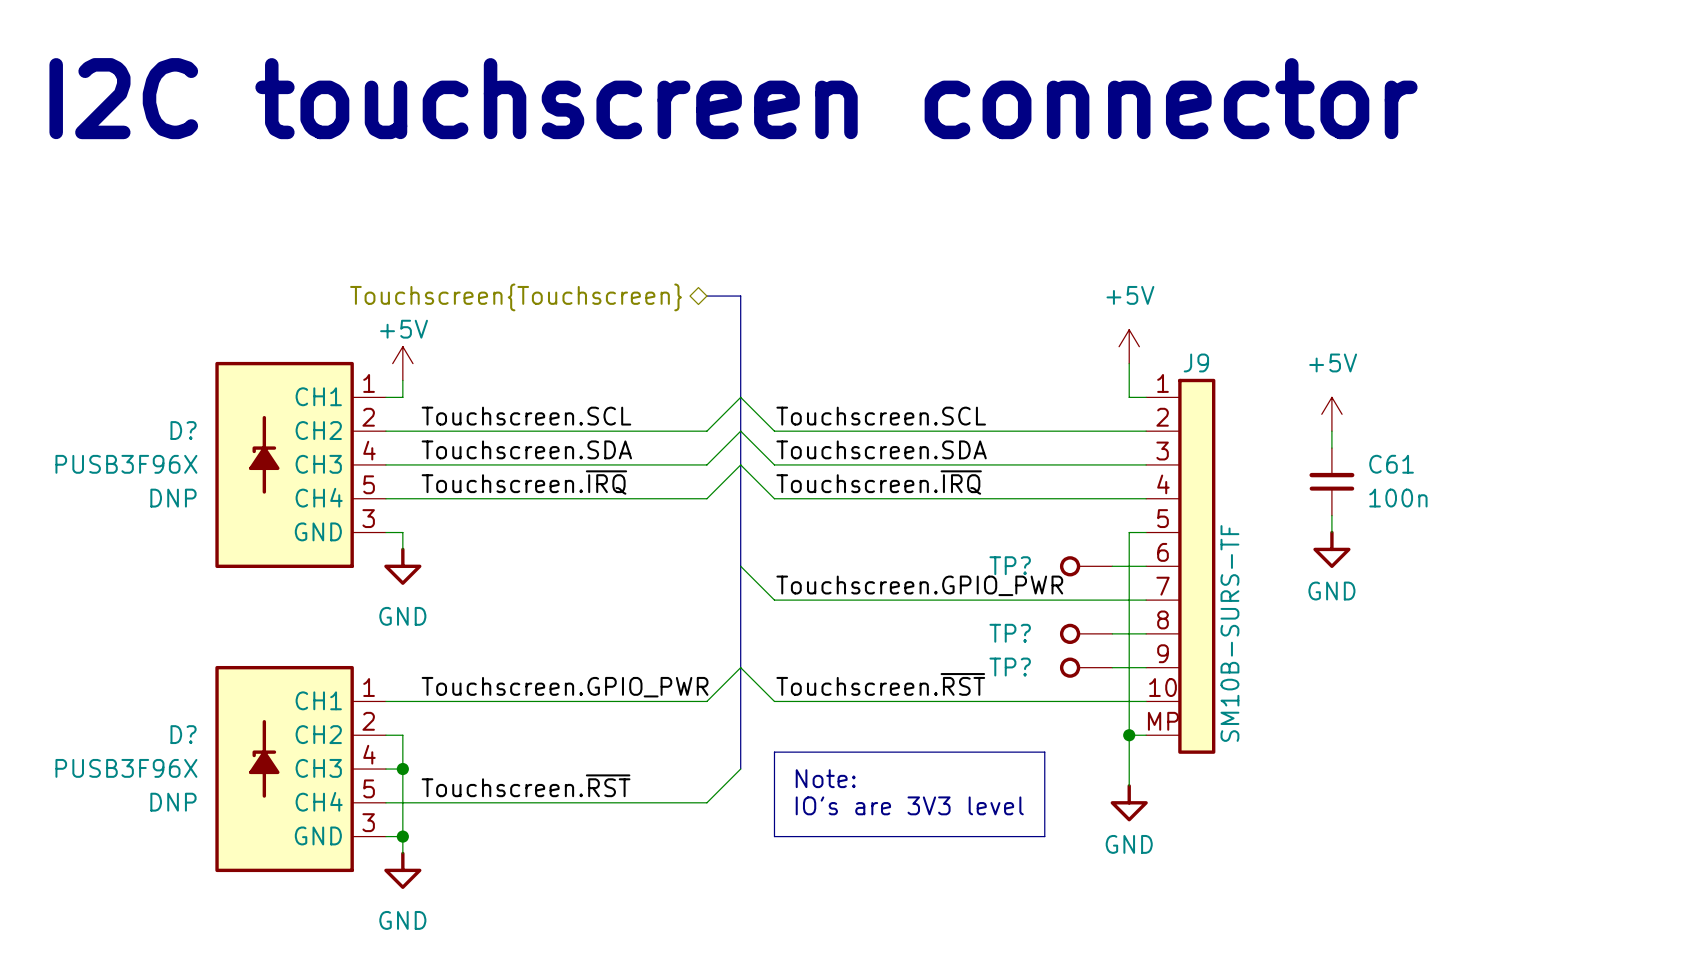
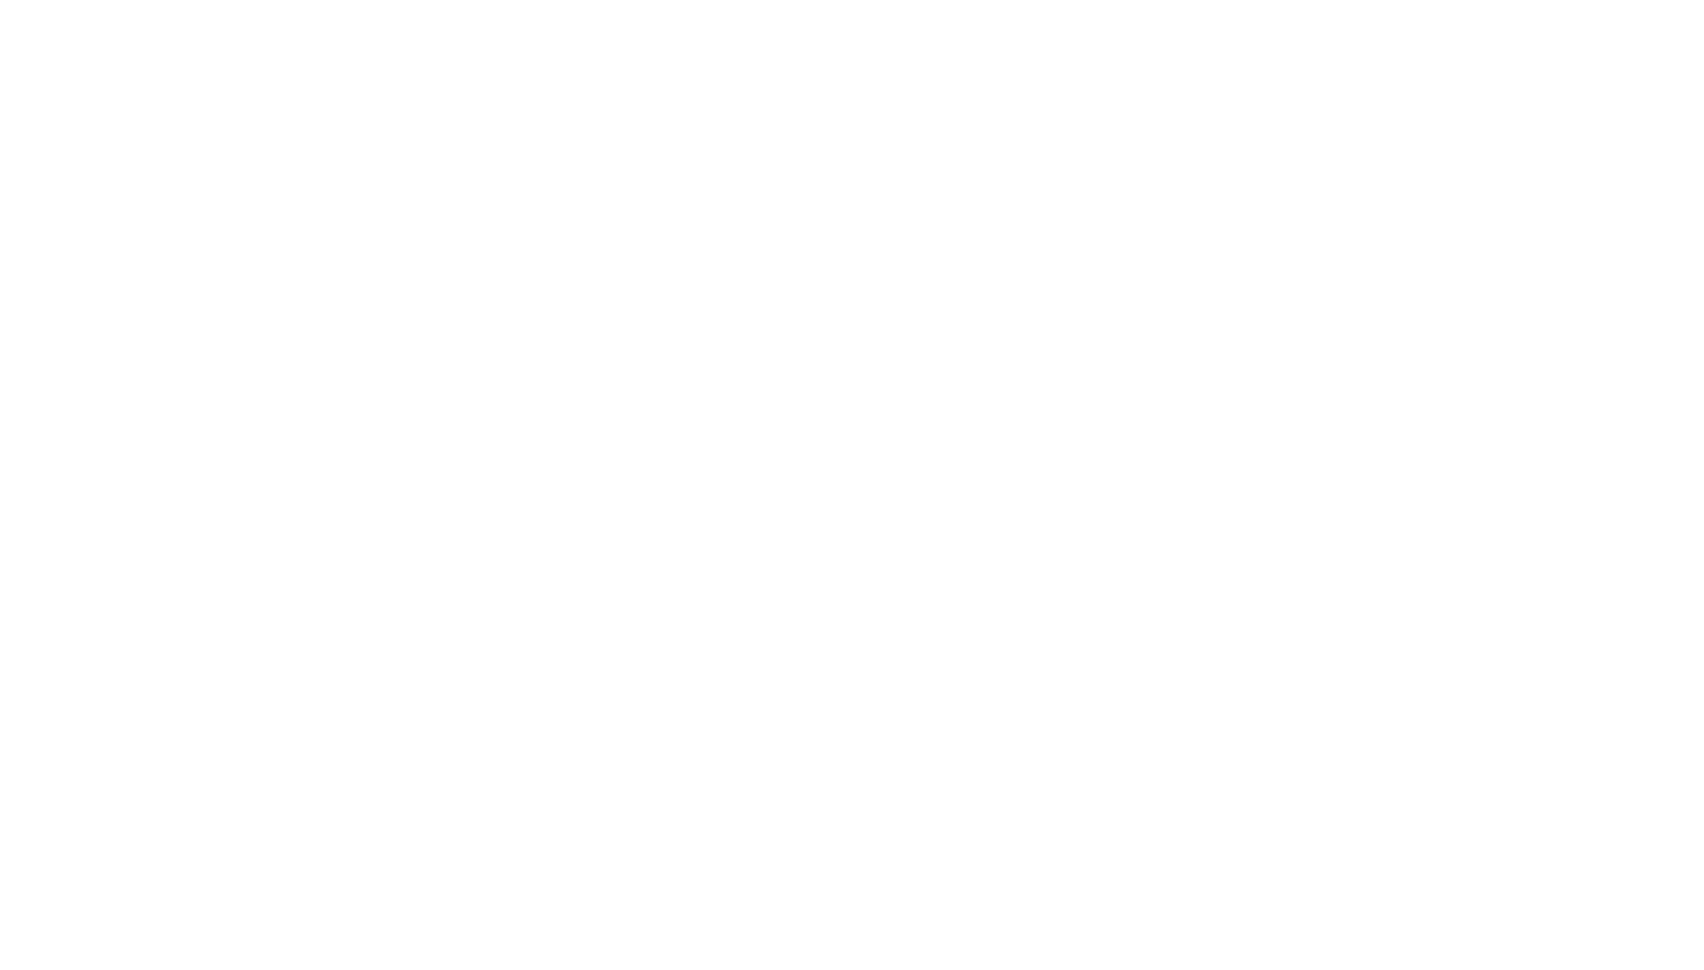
text: I2C touchscreen connector (733, 98) -> none
bus: (706, 296) (740, 296) (740, 769) -> none
hierarchical label: Touchscreen{Touchscreen} (516, 297) -> none
power symbol: +5V (1129, 346) -> none
power symbol: +5V (402, 363) -> none
wire: (1129, 363) (1129, 397) (1146, 397) -> none
wire: (402, 380) (402, 397) (385, 397) -> none
power symbol: +5V (1331, 414) -> none
label: Touchscreen.SCL (526, 416) -> none
label: Touchscreen.SCL (881, 416) -> none
wire: (385, 431) (706, 431) (740, 397) (774, 431) (1146, 431) -> none
wire: (1331, 431) (1331, 448) -> none
label: Touchscreen.SDA (526, 449) -> none
label: Touchscreen.SDA (881, 449) -> none
D?: (300, 464) -> none
wire: (385, 464) (706, 464) (740, 431) (774, 464) (1146, 464) -> none
C61: (1331, 481) -> none
label: Touchscreen.~{IRQ} (524, 482) -> none
label: Touchscreen.~{IRQ} (879, 482) -> none
wire: (385, 498) (706, 498) (740, 464) (774, 498) (1146, 498) -> none
wire: (1331, 515) (1331, 532) -> none
wire: (385, 532) (402, 532) (402, 549) -> none
wire: (1146, 532) (1129, 532) (1129, 785) -> none
power symbol: GND (1331, 549) -> none
power symbol: GND (402, 566) -> none
wire: (740, 566) (774, 600) (1146, 600) -> none
TP?: (1086, 566) -> none
wire: (1112, 566) (1146, 566) -> none
J9: (1180, 566) -> none
label: Touchscreen.GPIO_PWR (919, 585) -> none
TP?: (1086, 633) -> none
wire: (1112, 633) (1146, 633) -> none
TP?: (1086, 667) -> none
wire: (1112, 667) (1146, 667) -> none
label: Touchscreen.~{RST} (880, 684) -> none
label: Touchscreen.GPIO_PWR (565, 687) -> none
wire: (385, 701) (706, 701) (740, 667) (774, 701) (1146, 701) -> none
wire: (385, 735) (402, 735) (402, 853) -> none
wire: (1129, 735) (1146, 735) -> none
junction: (1129, 735) -> none
line: (774, 752) (774, 836) (1044, 836) (1044, 752) (774, 752) -> none
D?: (300, 769) -> none
wire: (385, 769) (402, 769) -> none
junction: (402, 769) -> none
wire: (740, 769) (706, 802) (385, 802) -> none
text: Note: (825, 778) -> none
label: Touchscreen.~{RST} (526, 785) -> none
power symbol: GND (1129, 802) -> none
text: IO's are 3V3 level (909, 805) -> none
wire: (385, 836) (402, 836) -> none
junction: (402, 836) -> none
power symbol: GND (402, 870) -> none

